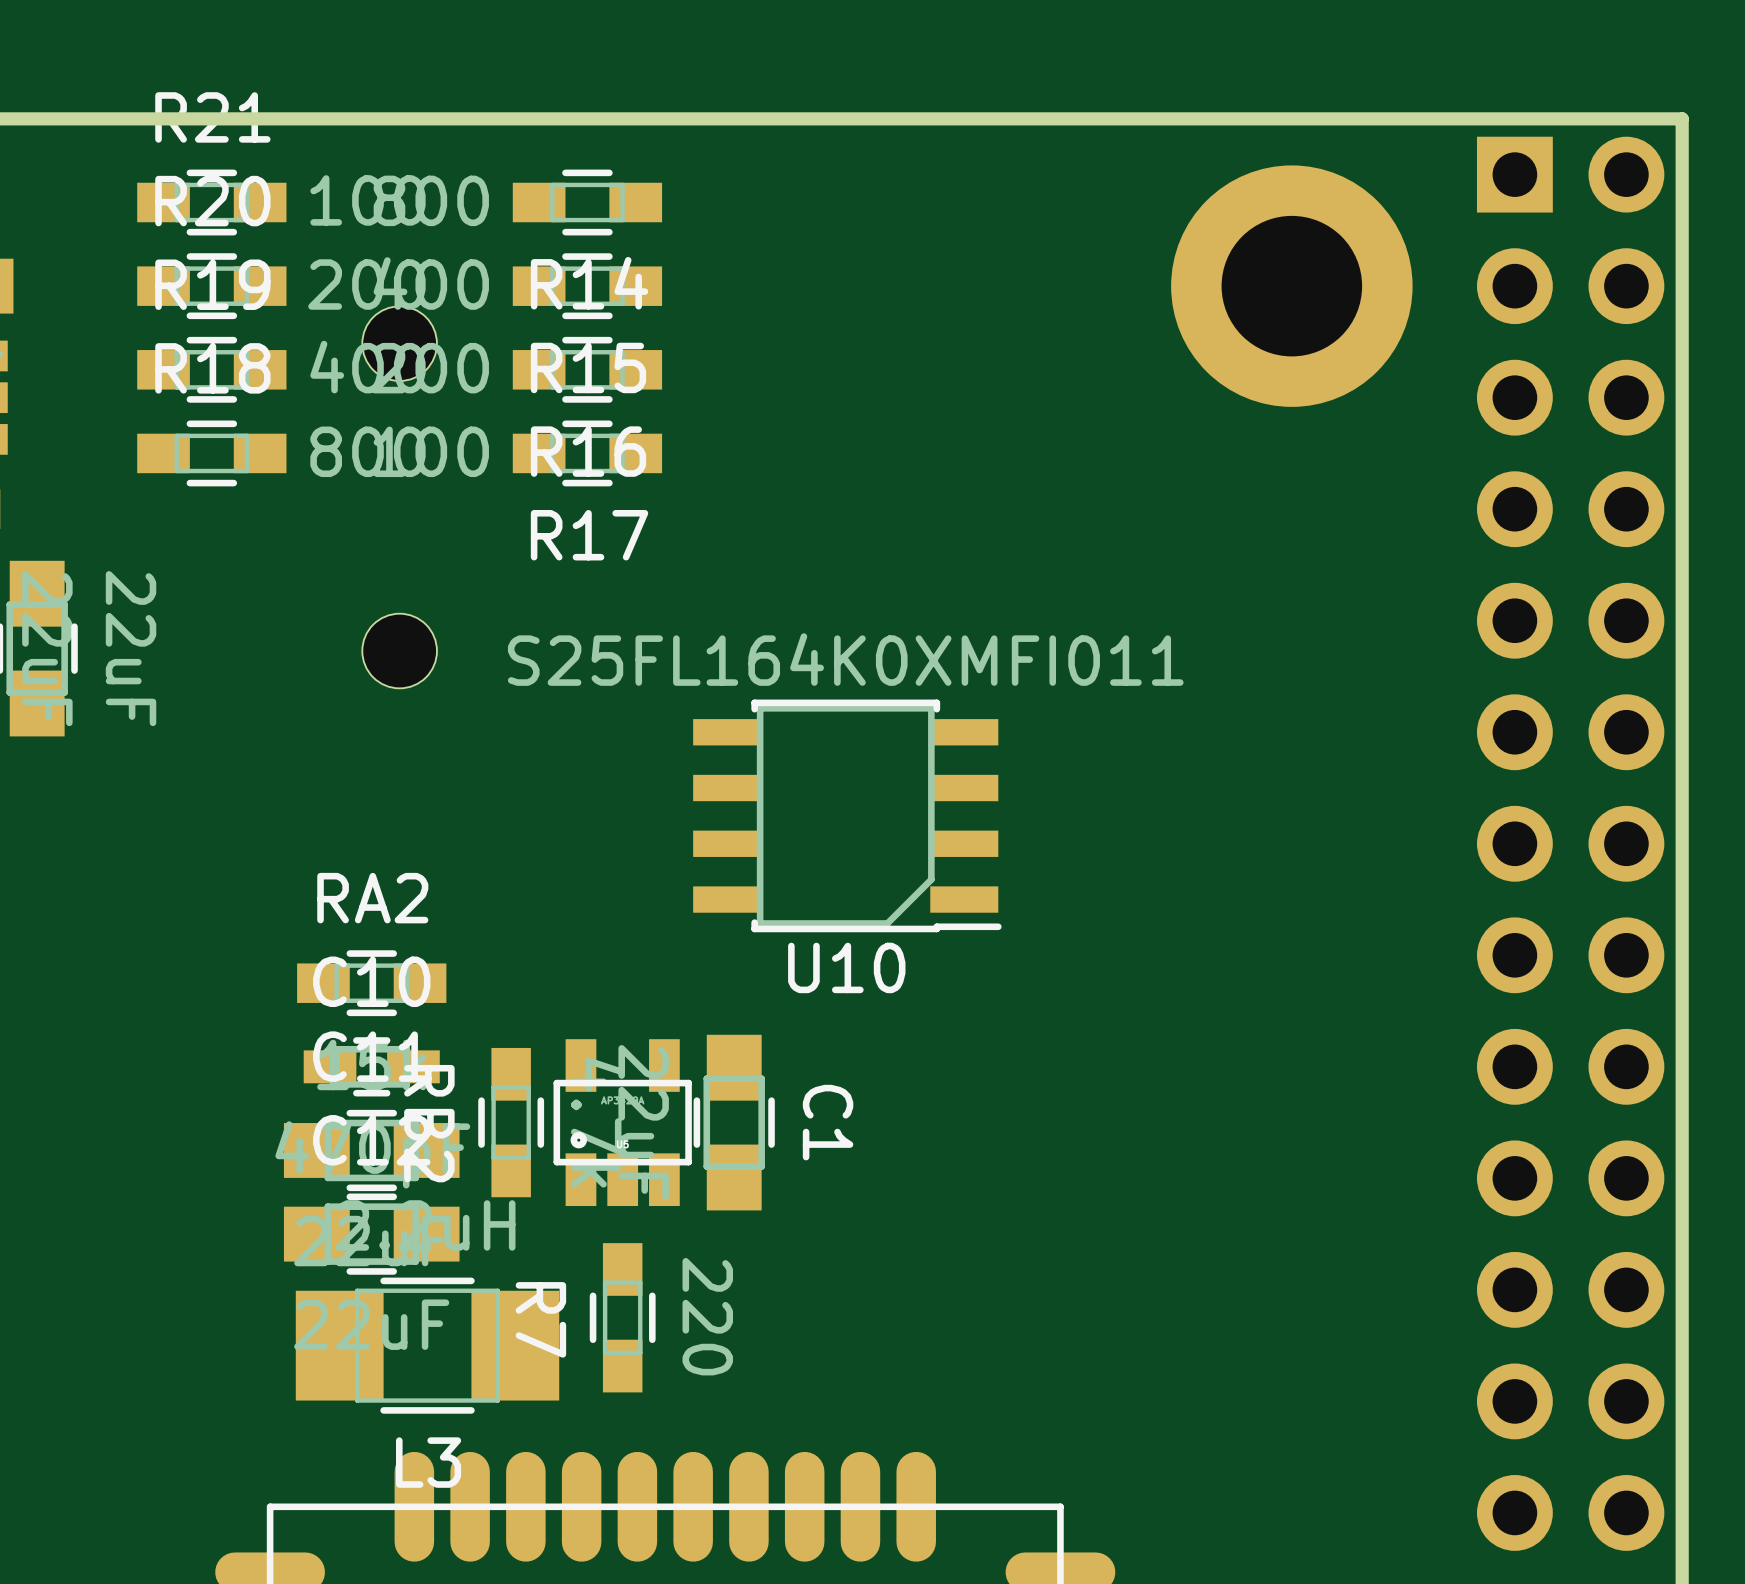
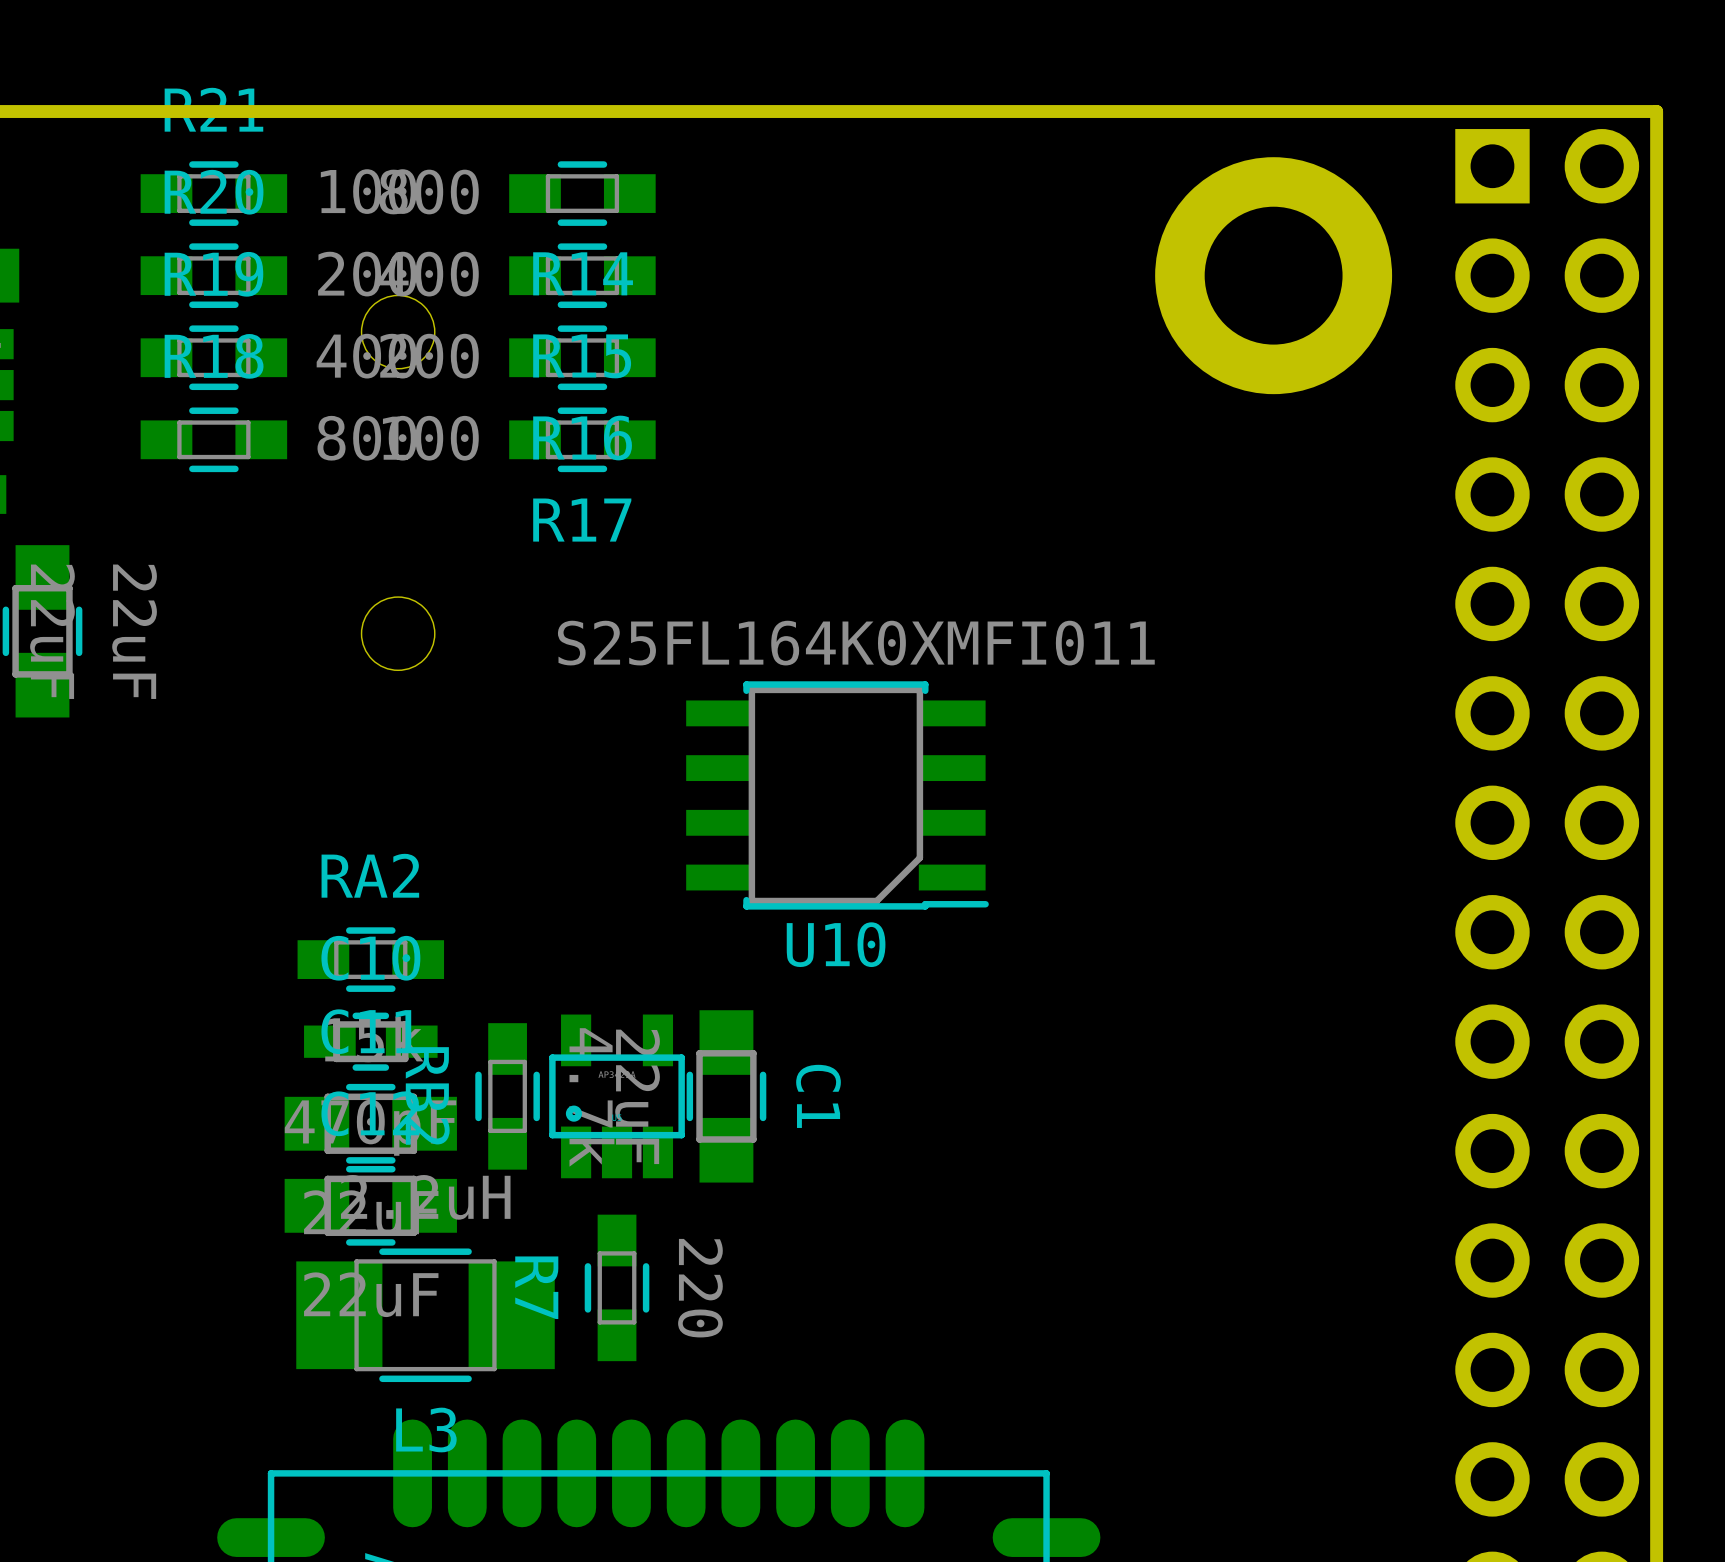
U10 value position: S25FL164K0XMFI011 (845, 659) -> S25FL164K0XMFI011 (856, 643)

